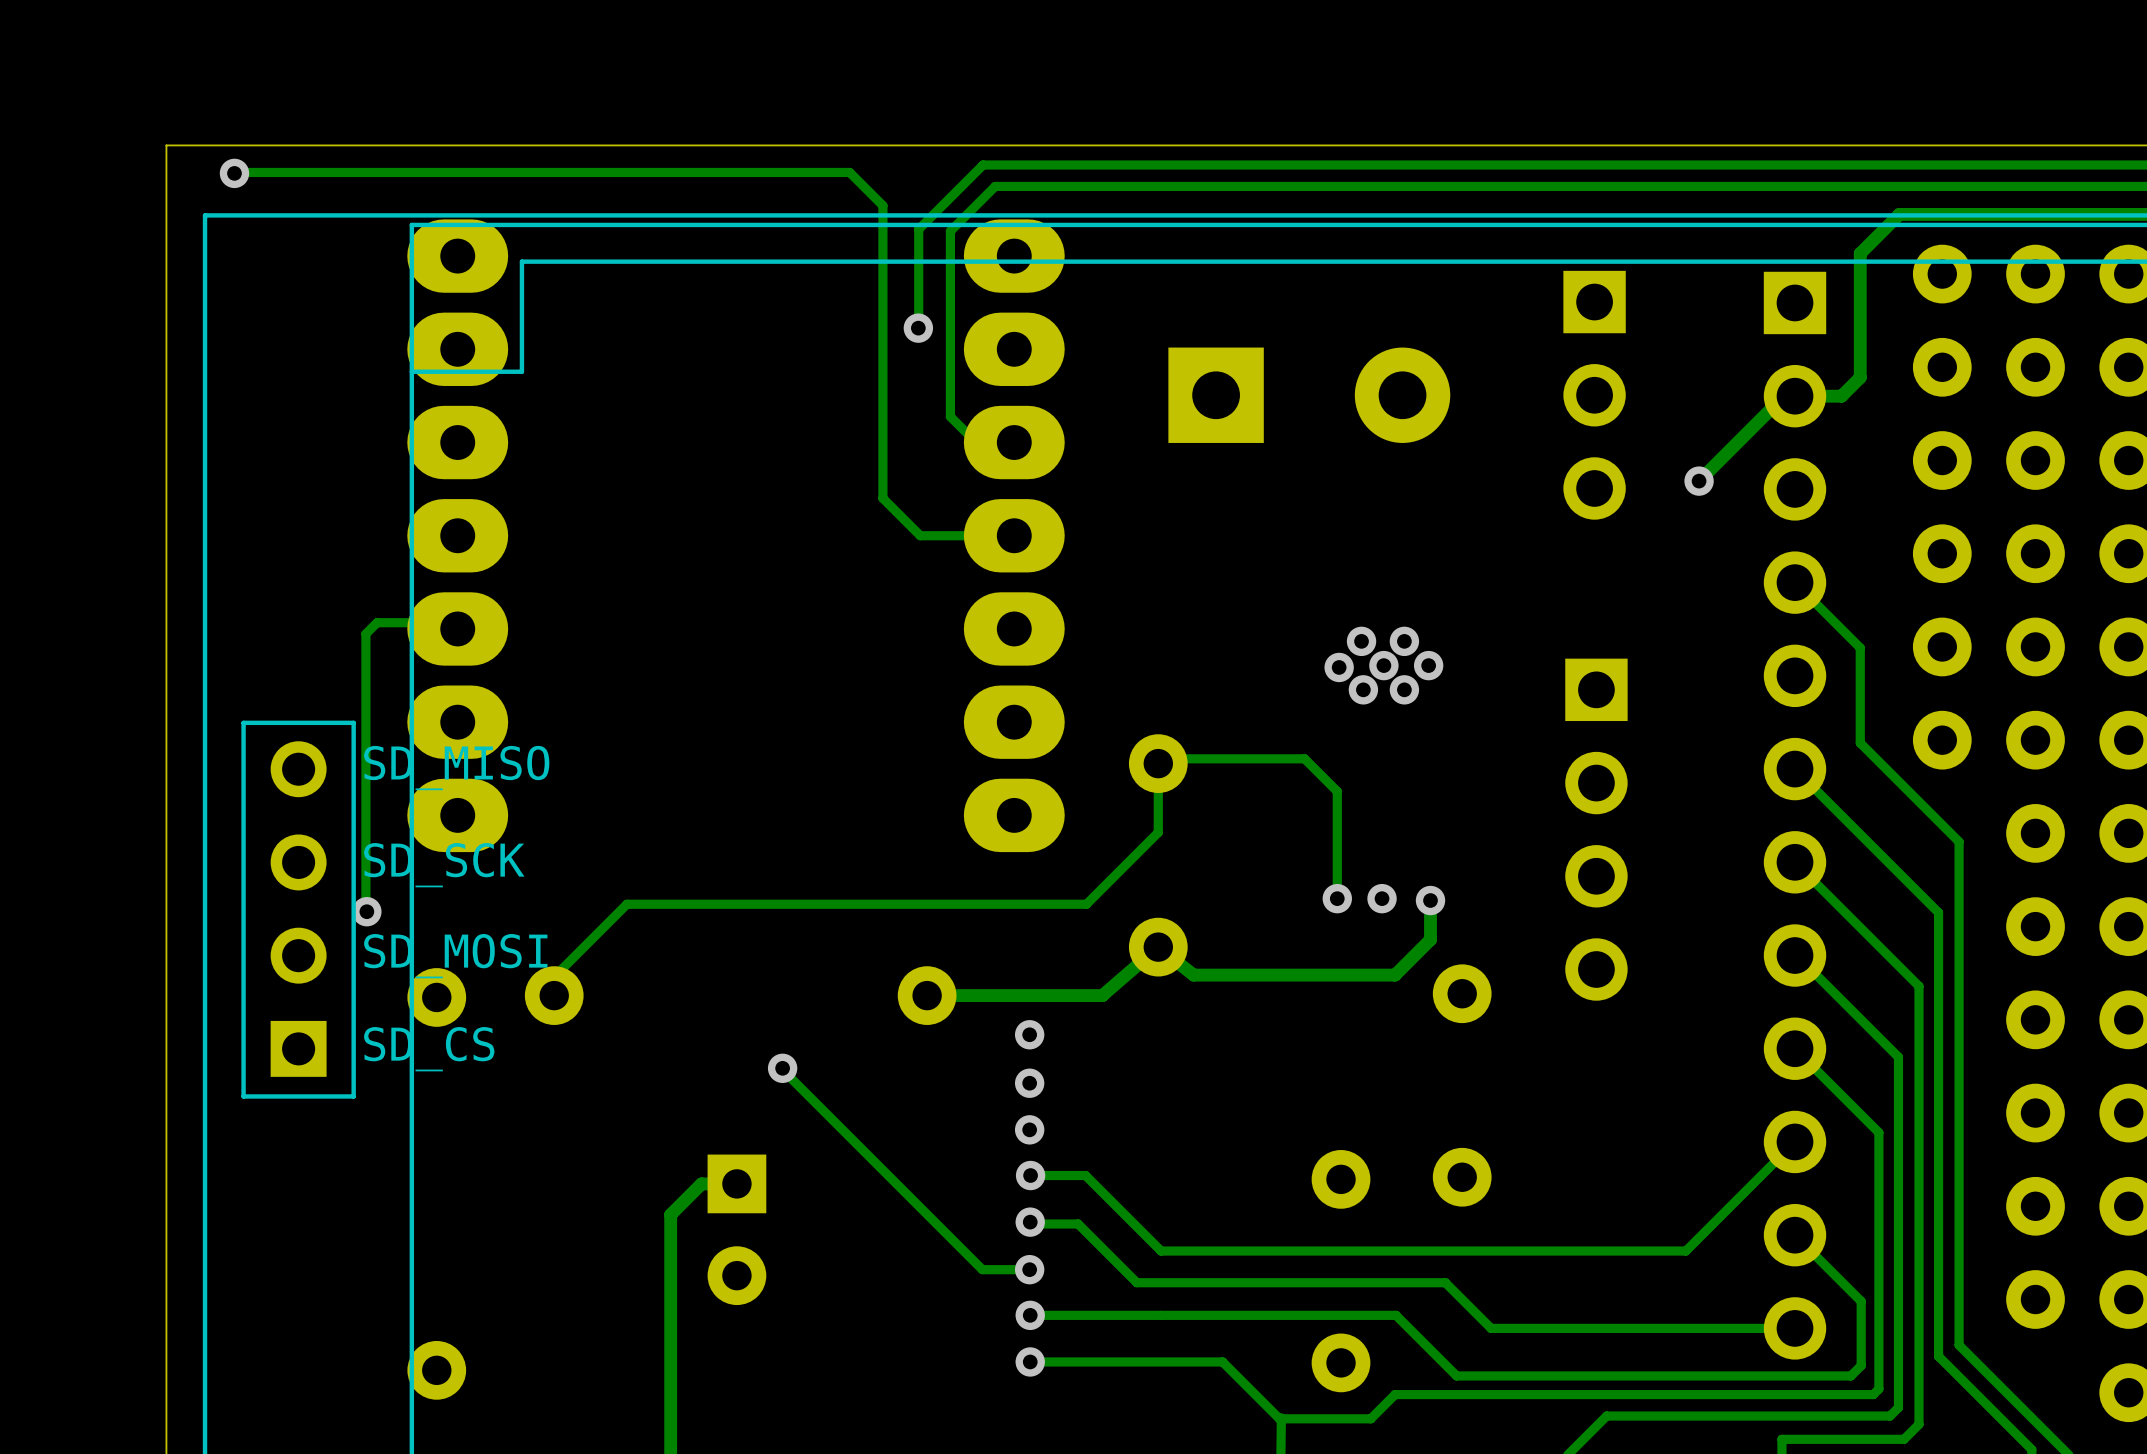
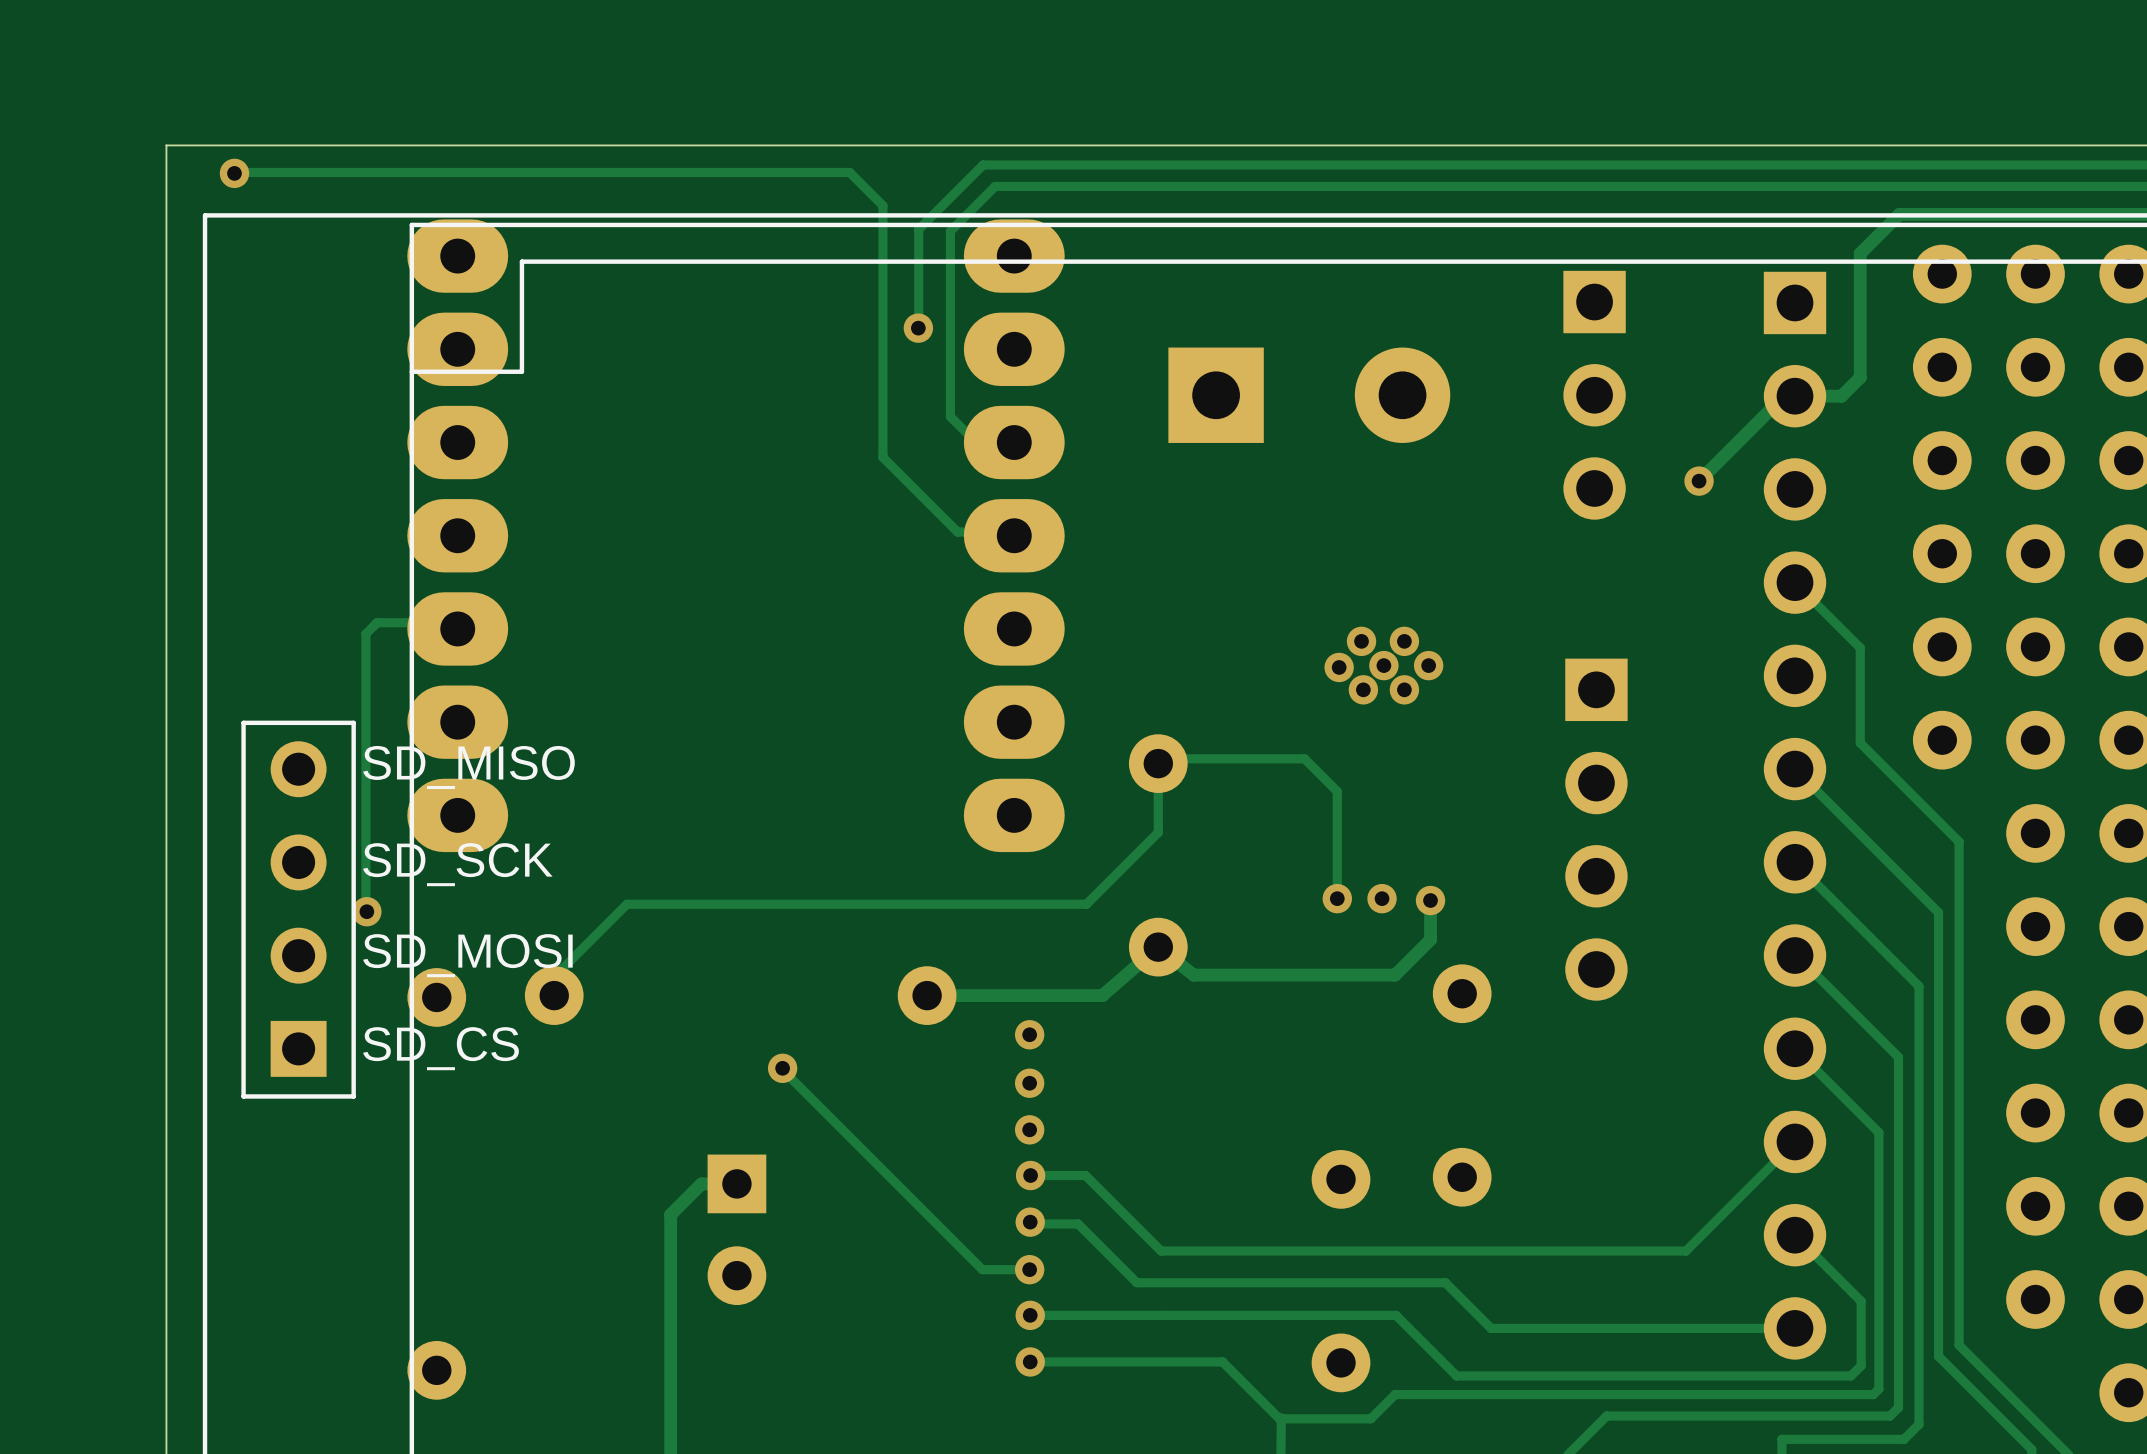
track: (882, 457) (882, 498) (920, 535) (1014, 535) (1027, 532) -> (882, 457) (957, 532) (1027, 532)

